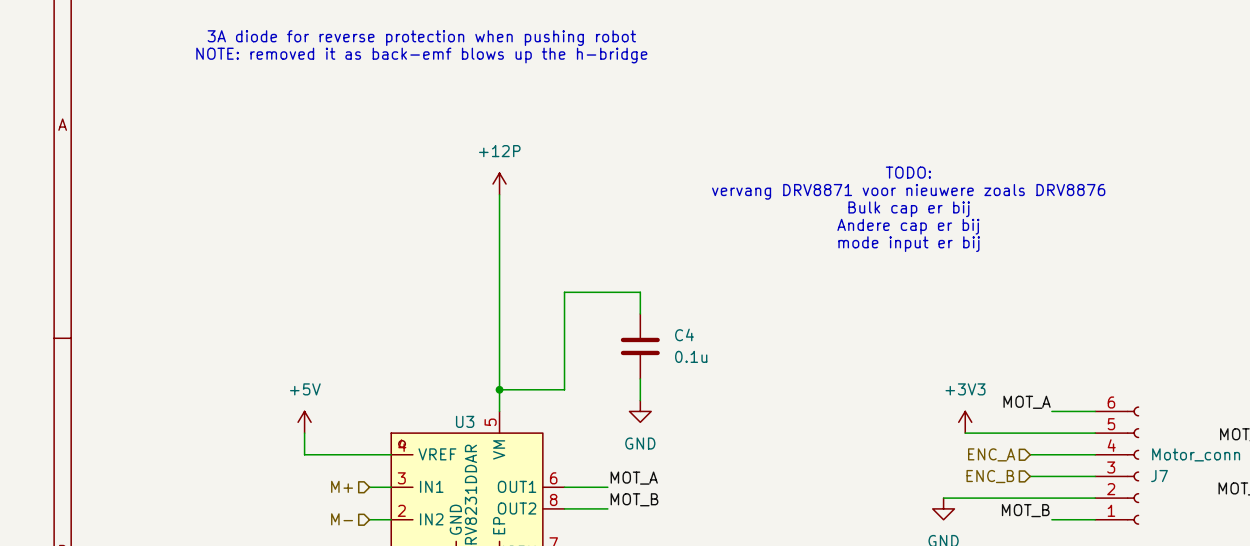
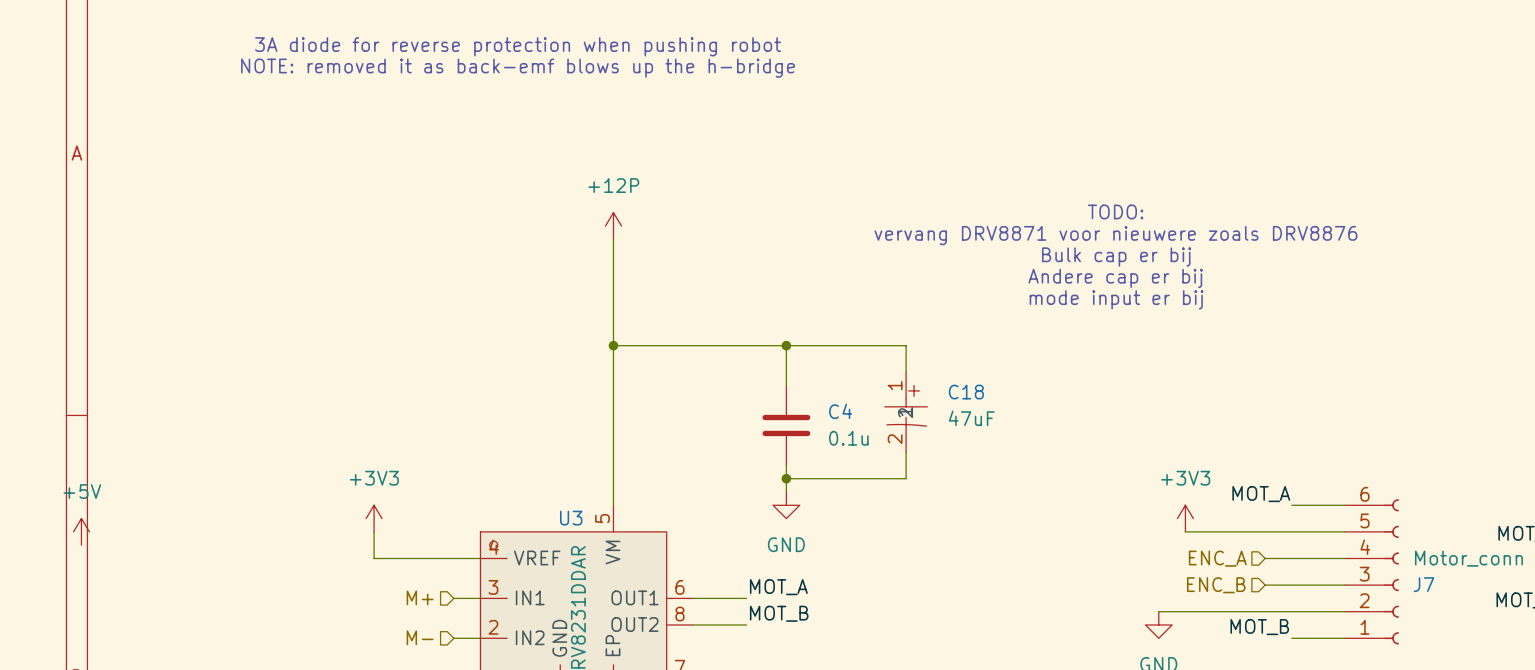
wire: none -> (613, 345) (906, 345) (906, 372)
junction: none -> (613, 345)
junction: none -> (786, 345)
wire: (640, 292) (564, 292) (564, 389) (499, 389) -> (786, 358) (786, 345)
C18: none -> 47uF (906, 412)
wire: none -> (906, 452) (906, 478) (786, 478)
junction: (499, 389) -> none
junction: none -> (786, 478)
power symbol: +5V (304, 422) -> +3V3 (374, 518)
power symbol: none -> +5V (81, 531)

